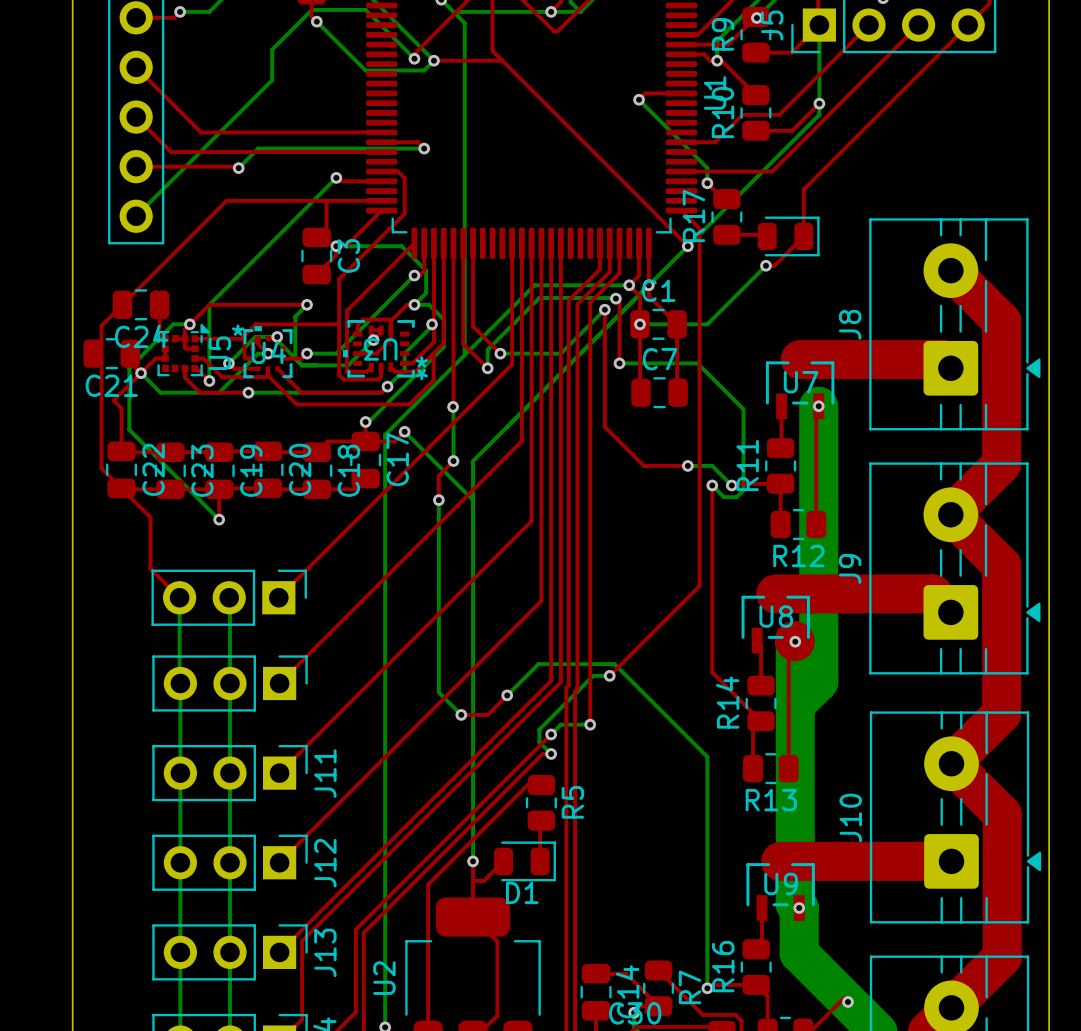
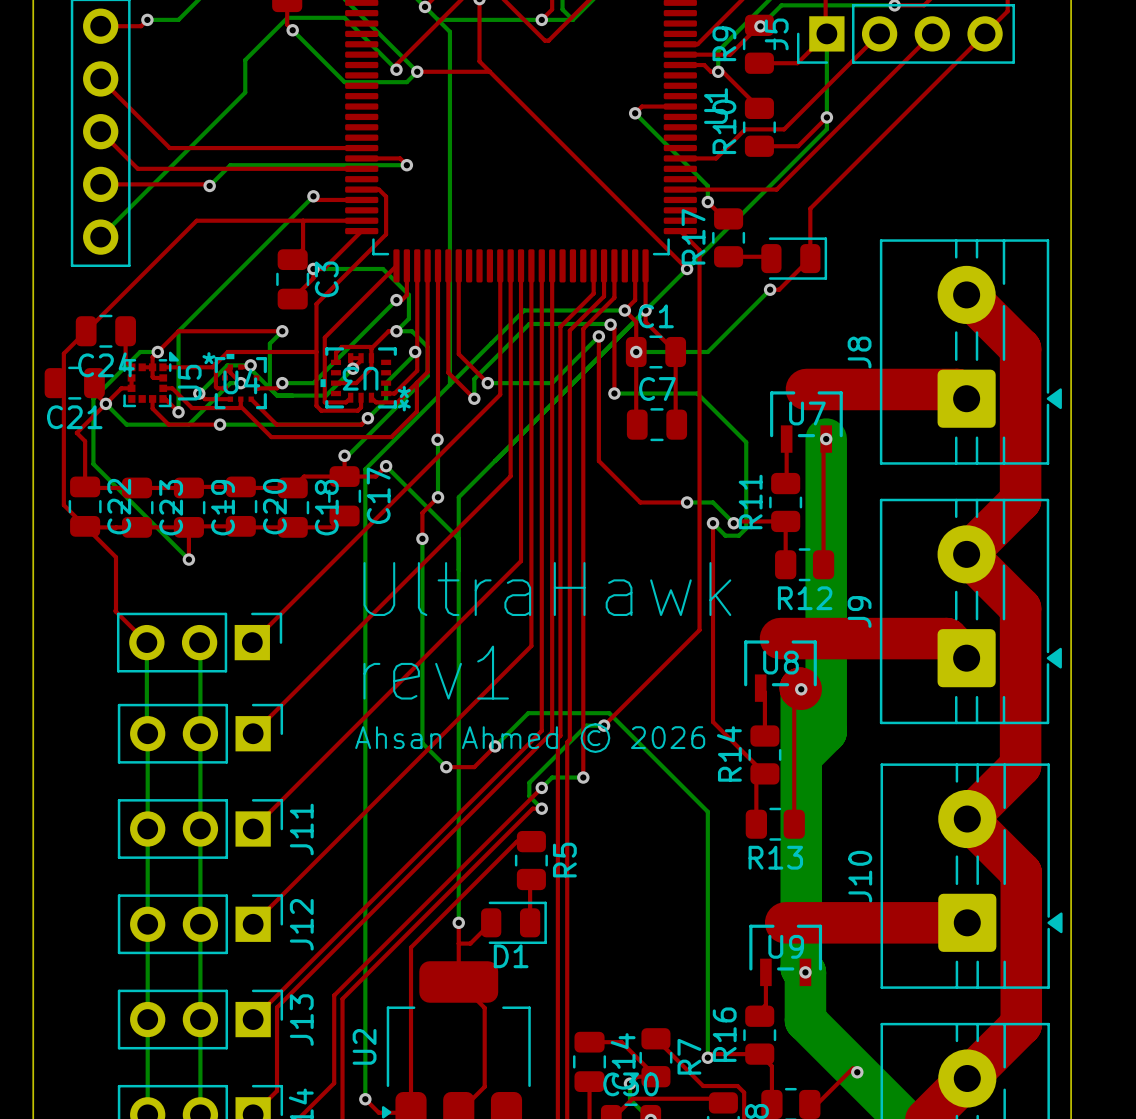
text: none -> UltraHawk (547, 589)
text: none -> rev1 (436, 672)
text: none -> Ahsan Ahmed © 2026 (530, 738)

